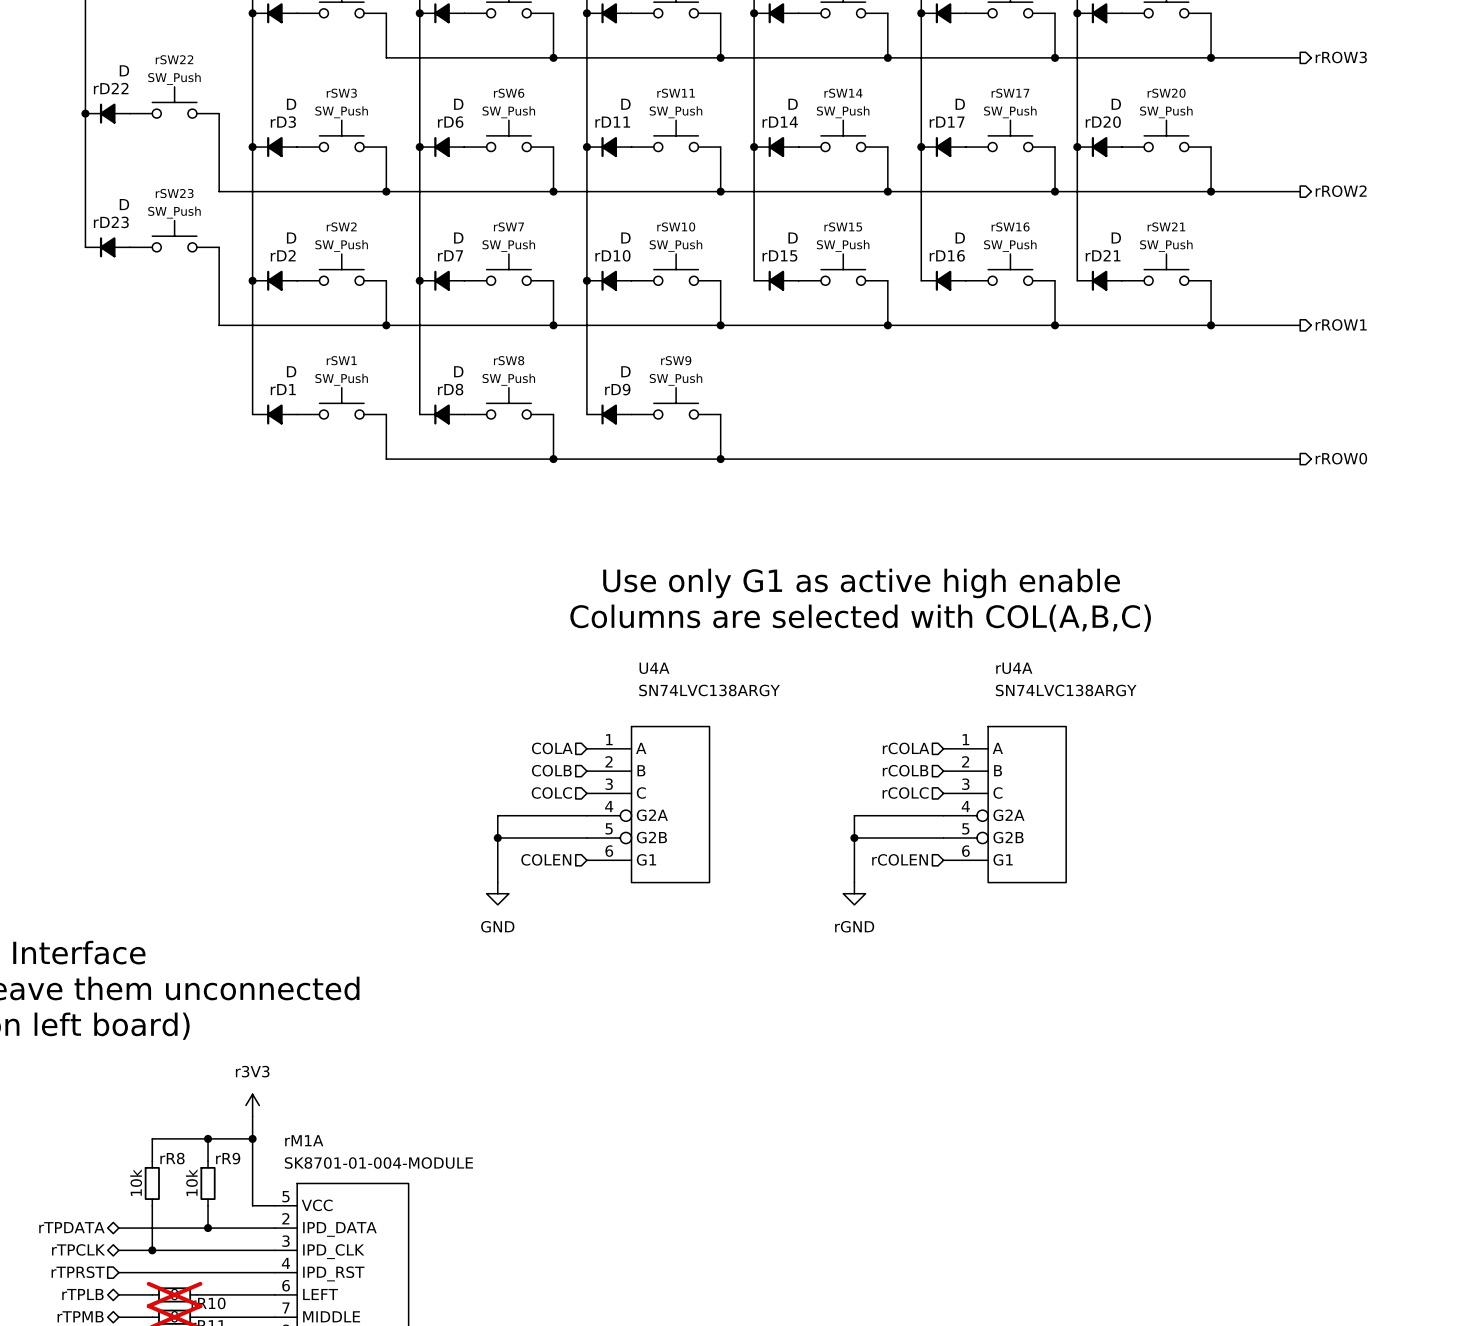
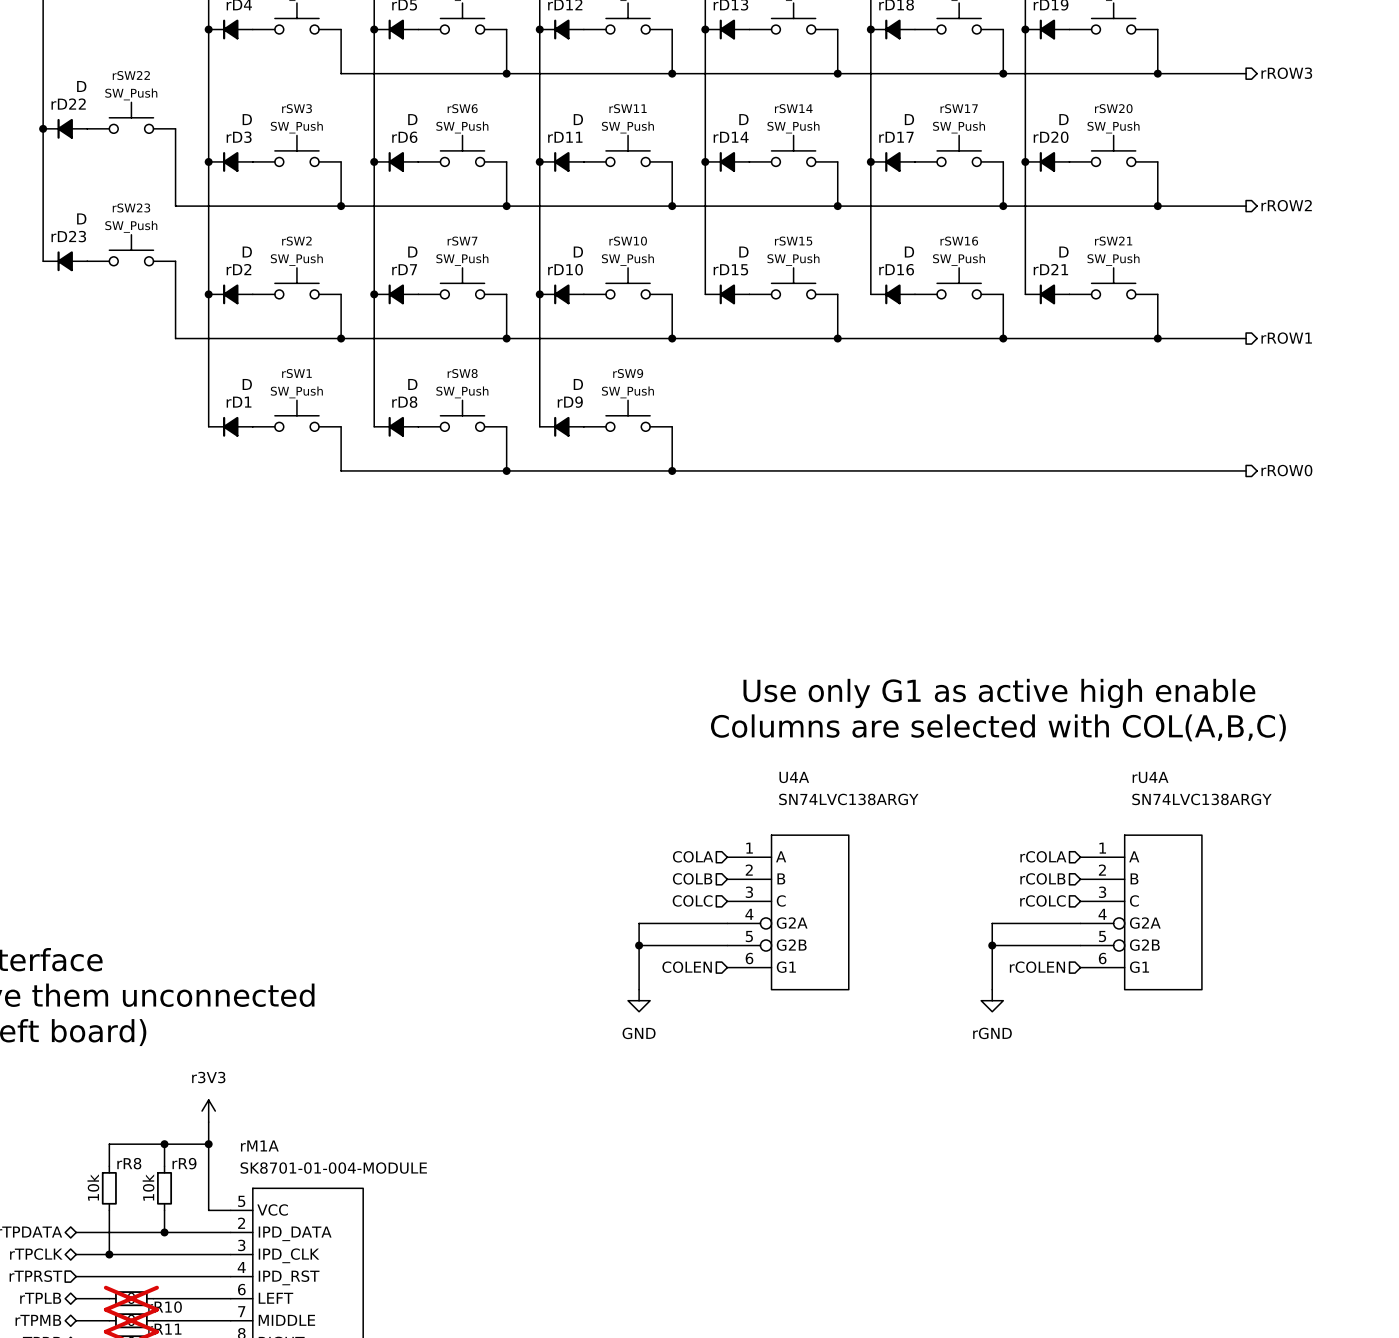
text position: Use only G1 as active high enable (861, 583) -> Use only G1 as active high enable (999, 693)
text position: Columns are selected with COL(A,B,C) (860, 618) -> Columns are selected with COL(A,B,C) (998, 727)
hierarchical label position: COLA (552, 748) -> COLA (693, 856)
hierarchical label position: rCOLA (906, 748) -> rCOLA (1043, 856)
hierarchical label position: COLB (551, 770) -> COLB (692, 878)
hierarchical label position: rCOLB (905, 770) -> rCOLB (1042, 878)
hierarchical label position: COLC (551, 793) -> COLC (692, 900)
hierarchical label position: rCOLC (905, 793) -> rCOLC (1042, 900)
U4A position: (648, 804) -> (788, 912)
rU4A position: (1004, 804) -> (1141, 912)
wire: (586, 815) (497, 815) (497, 882) -> (727, 923) (639, 923) (639, 989)
wire: (943, 815) (854, 815) (854, 882) -> (1080, 923) (992, 923) (992, 989)
wire: (497, 838) (586, 838) -> (639, 945) (727, 945)
junction: (497, 838) -> none
wire: (854, 838) (943, 838) -> (992, 945) (1080, 945)
junction: (854, 838) -> none
hierarchical label position: COLEN (546, 859) -> COLEN (687, 967)
hierarchical label position: rCOLEN (900, 859) -> rCOLEN (1037, 967)
power symbol position: GND (497, 893) -> GND (639, 1000)
power symbol position: rGND (854, 893) -> rGND (992, 1000)
junction: none -> (639, 945)
junction: none -> (992, 945)

